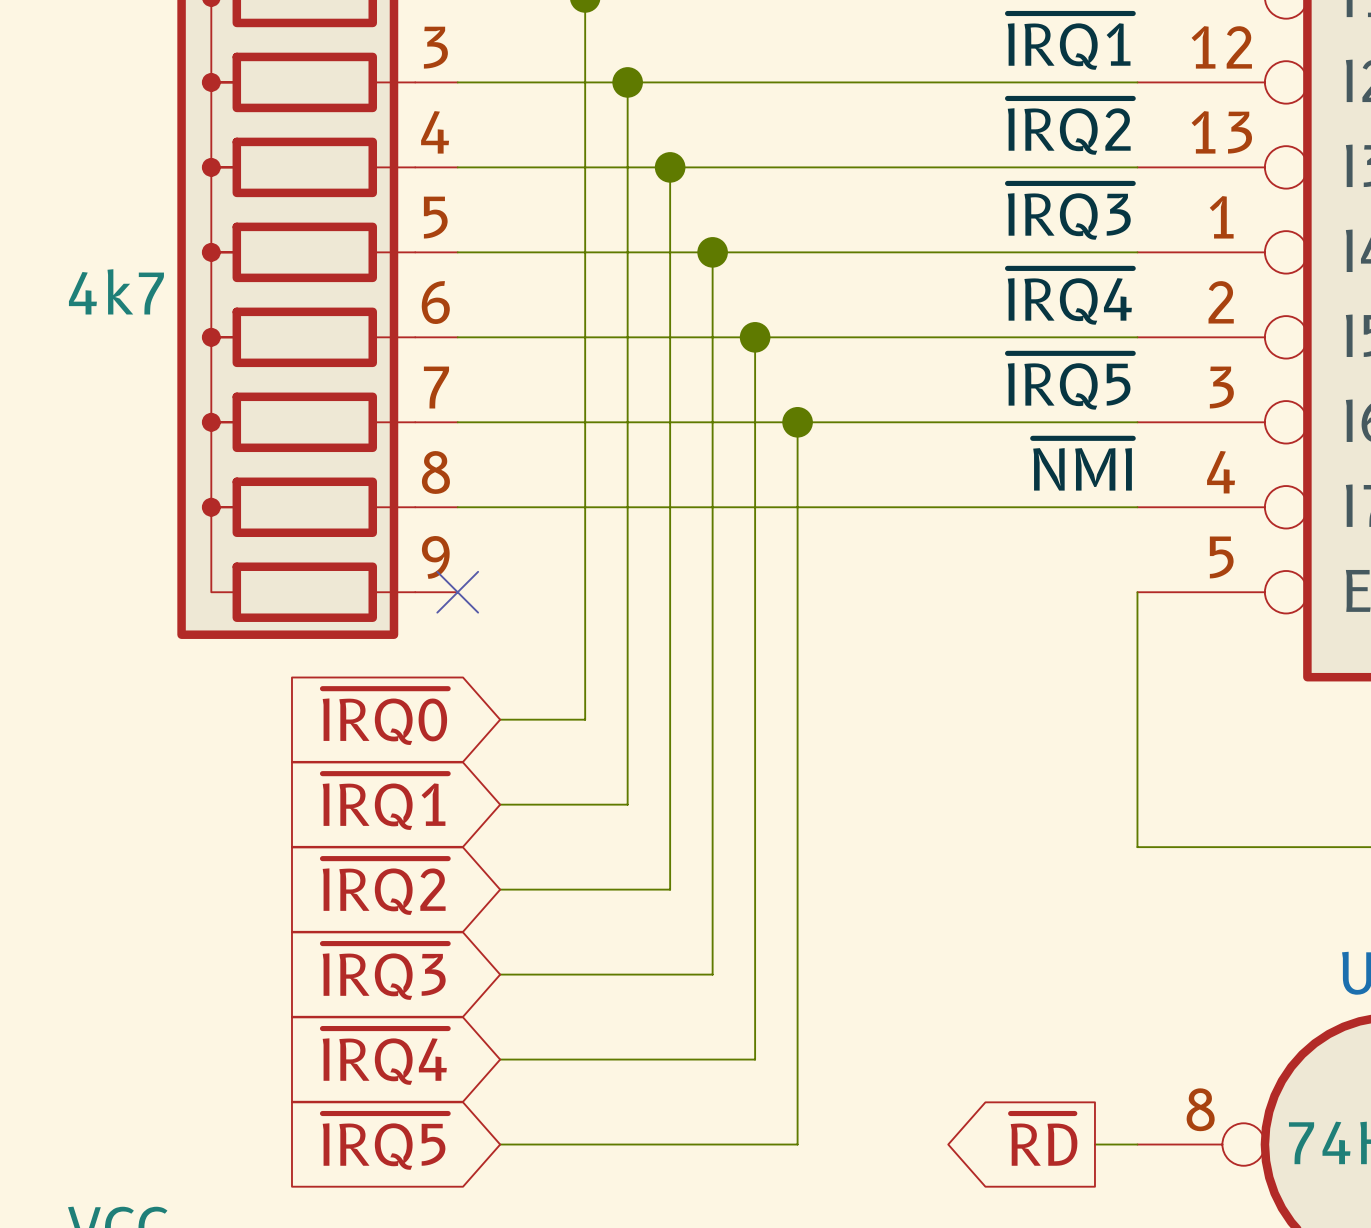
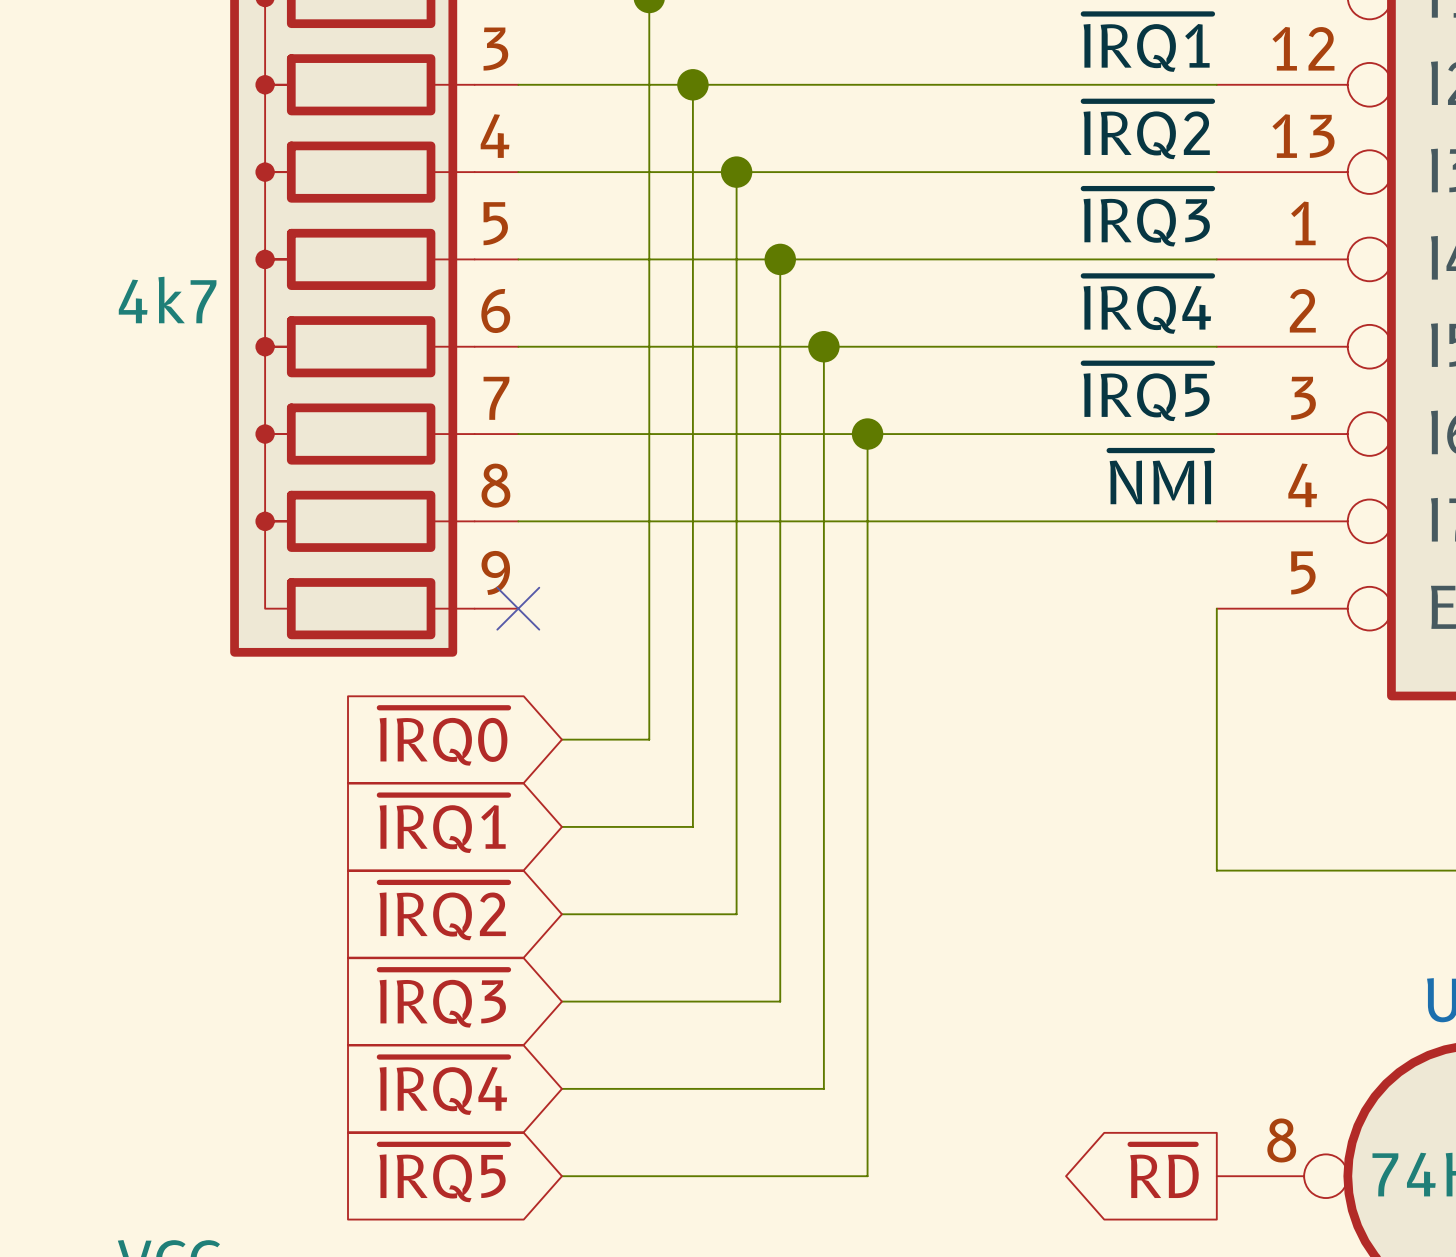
global label position: ~{RD} (1044, 1139) -> ~{RD} (1164, 1171)
wire: (1094, 1144) (1137, 1144) -> none

